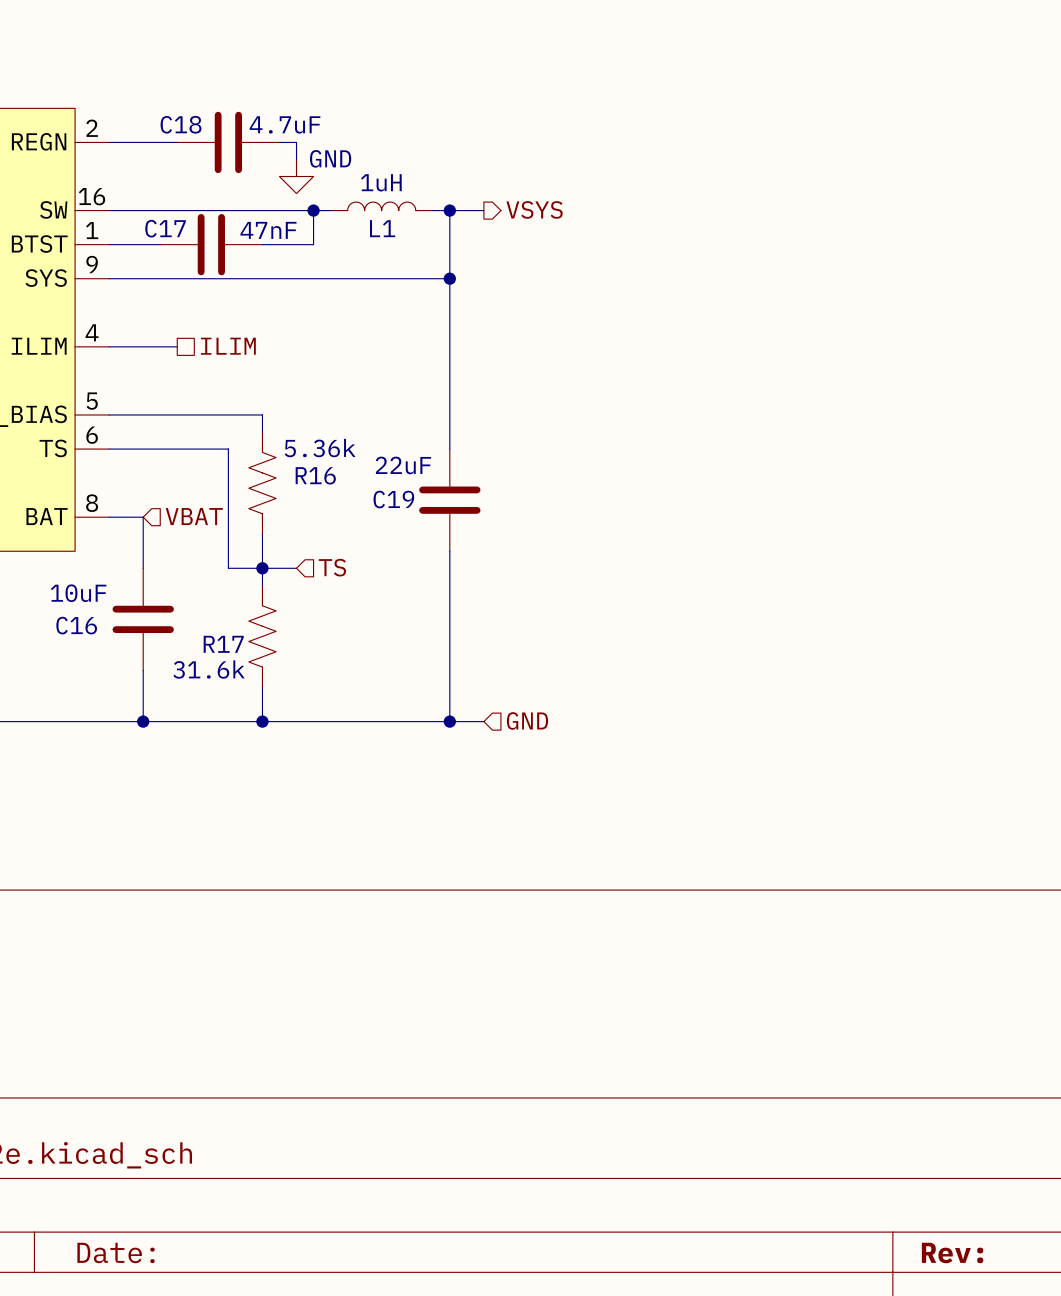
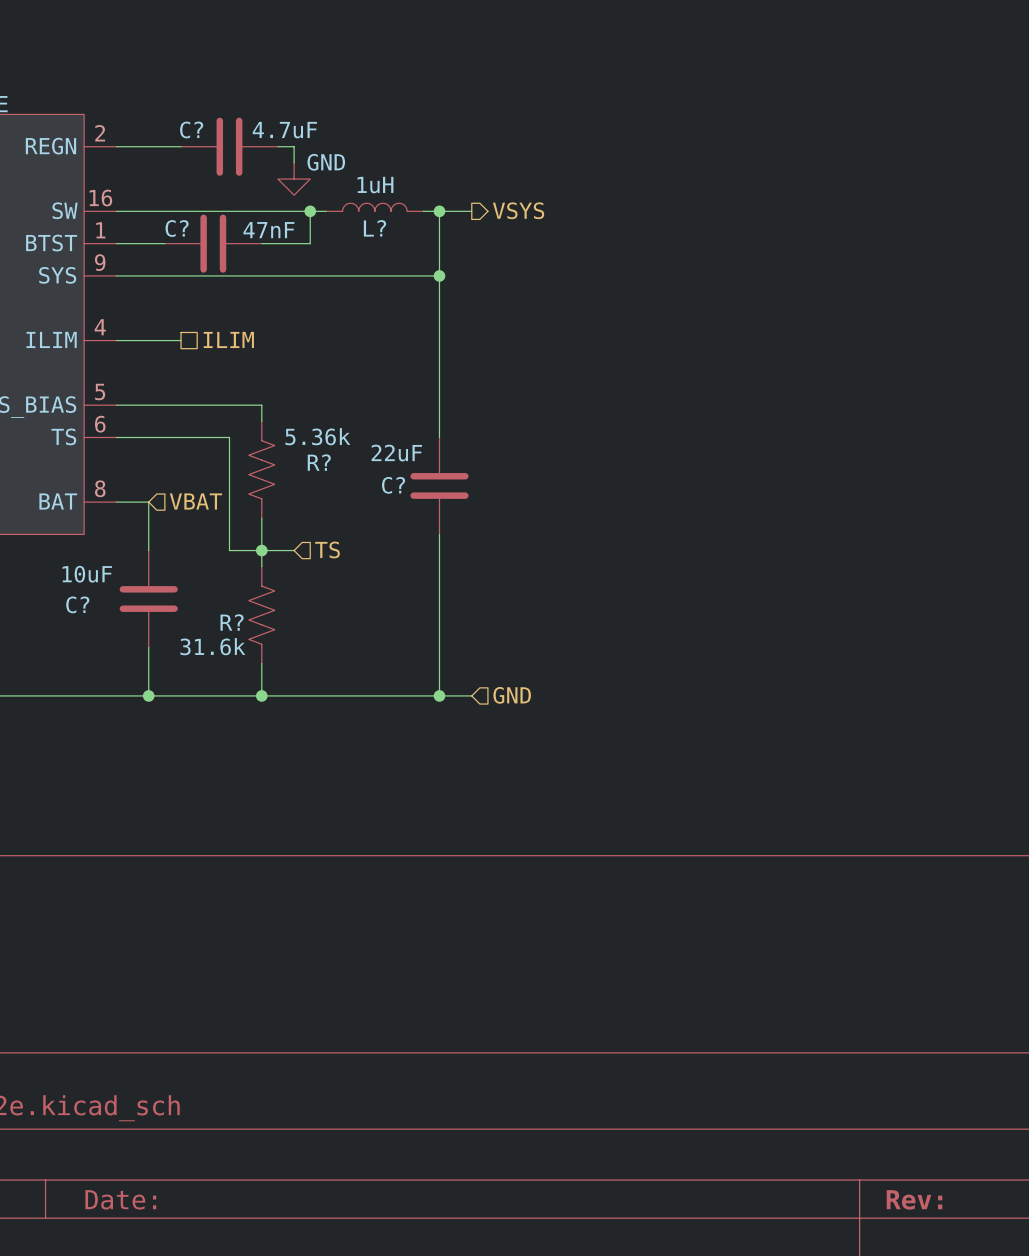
C18 name: C18 (181, 124) -> C? (191, 129)
C17 name: C17 (165, 228) -> C? (177, 228)
L1 name: L1 (382, 228) -> L? (374, 228)
R16 name: R16 (315, 475) -> R? (319, 462)
C19 name: C19 (393, 499) -> C? (393, 485)
C16 name: C16 (76, 625) -> C? (77, 604)
R17 name: R17 (223, 644) -> R? (232, 622)

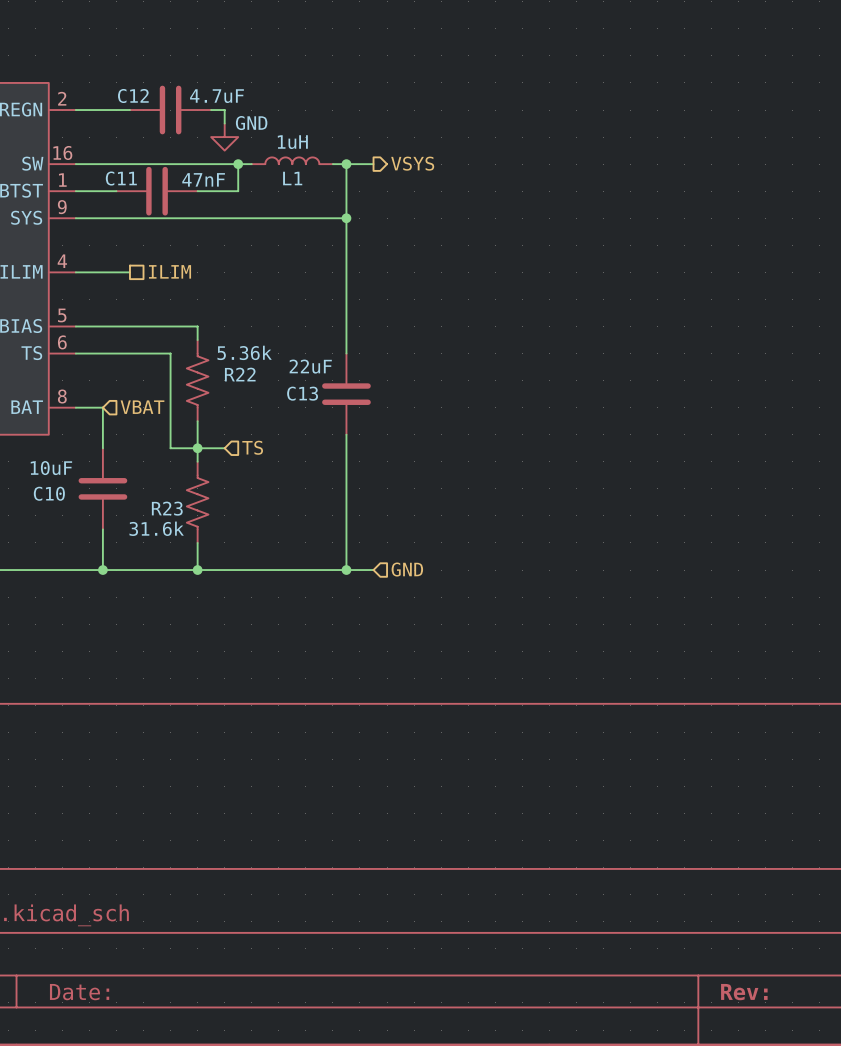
C? name: C? (191, 129) -> C12 (133, 95)
C? name: C? (177, 228) -> C11 (121, 178)
L? name: L? (374, 228) -> L1 (292, 178)
R? name: R? (319, 462) -> R22 (240, 374)
C? name: C? (393, 485) -> C13 (302, 393)
C? name: C? (77, 604) -> C10 (49, 493)
R? name: R? (232, 622) -> R23 (167, 508)

